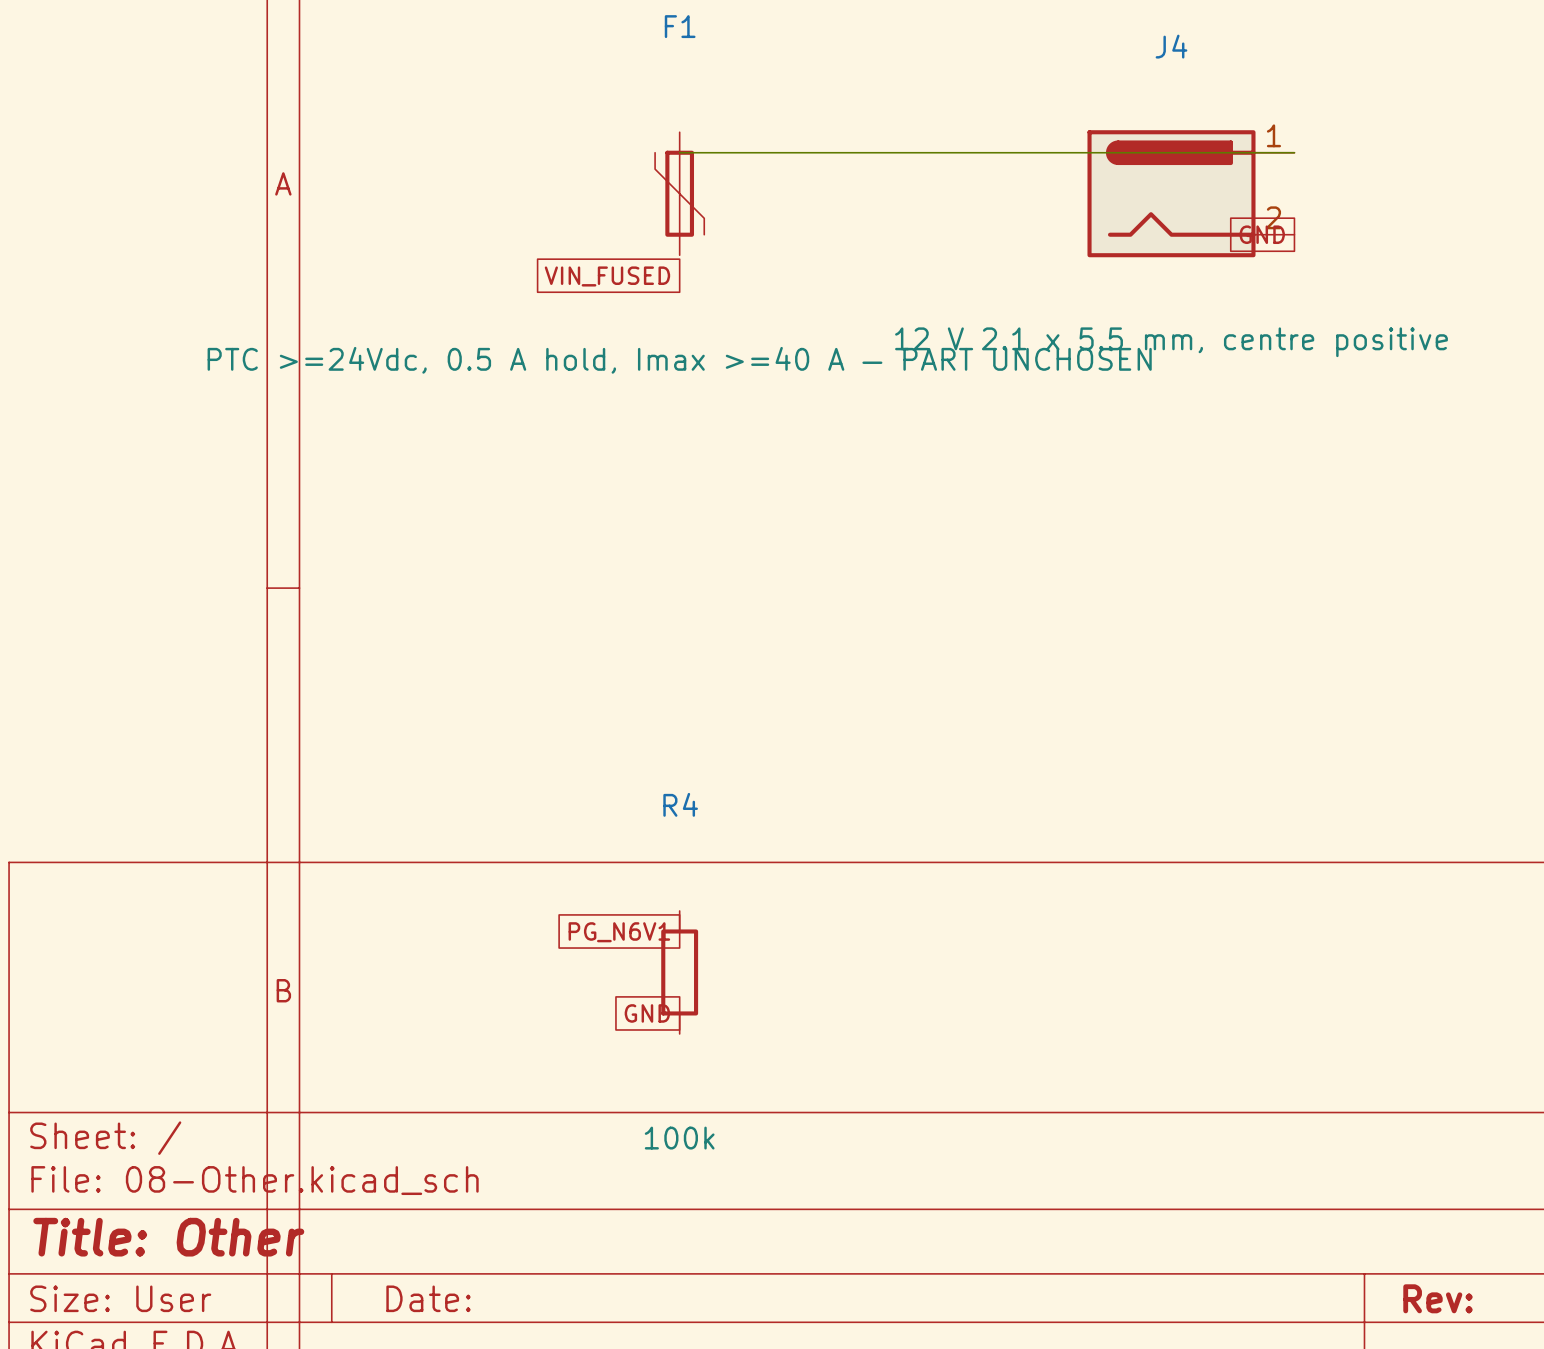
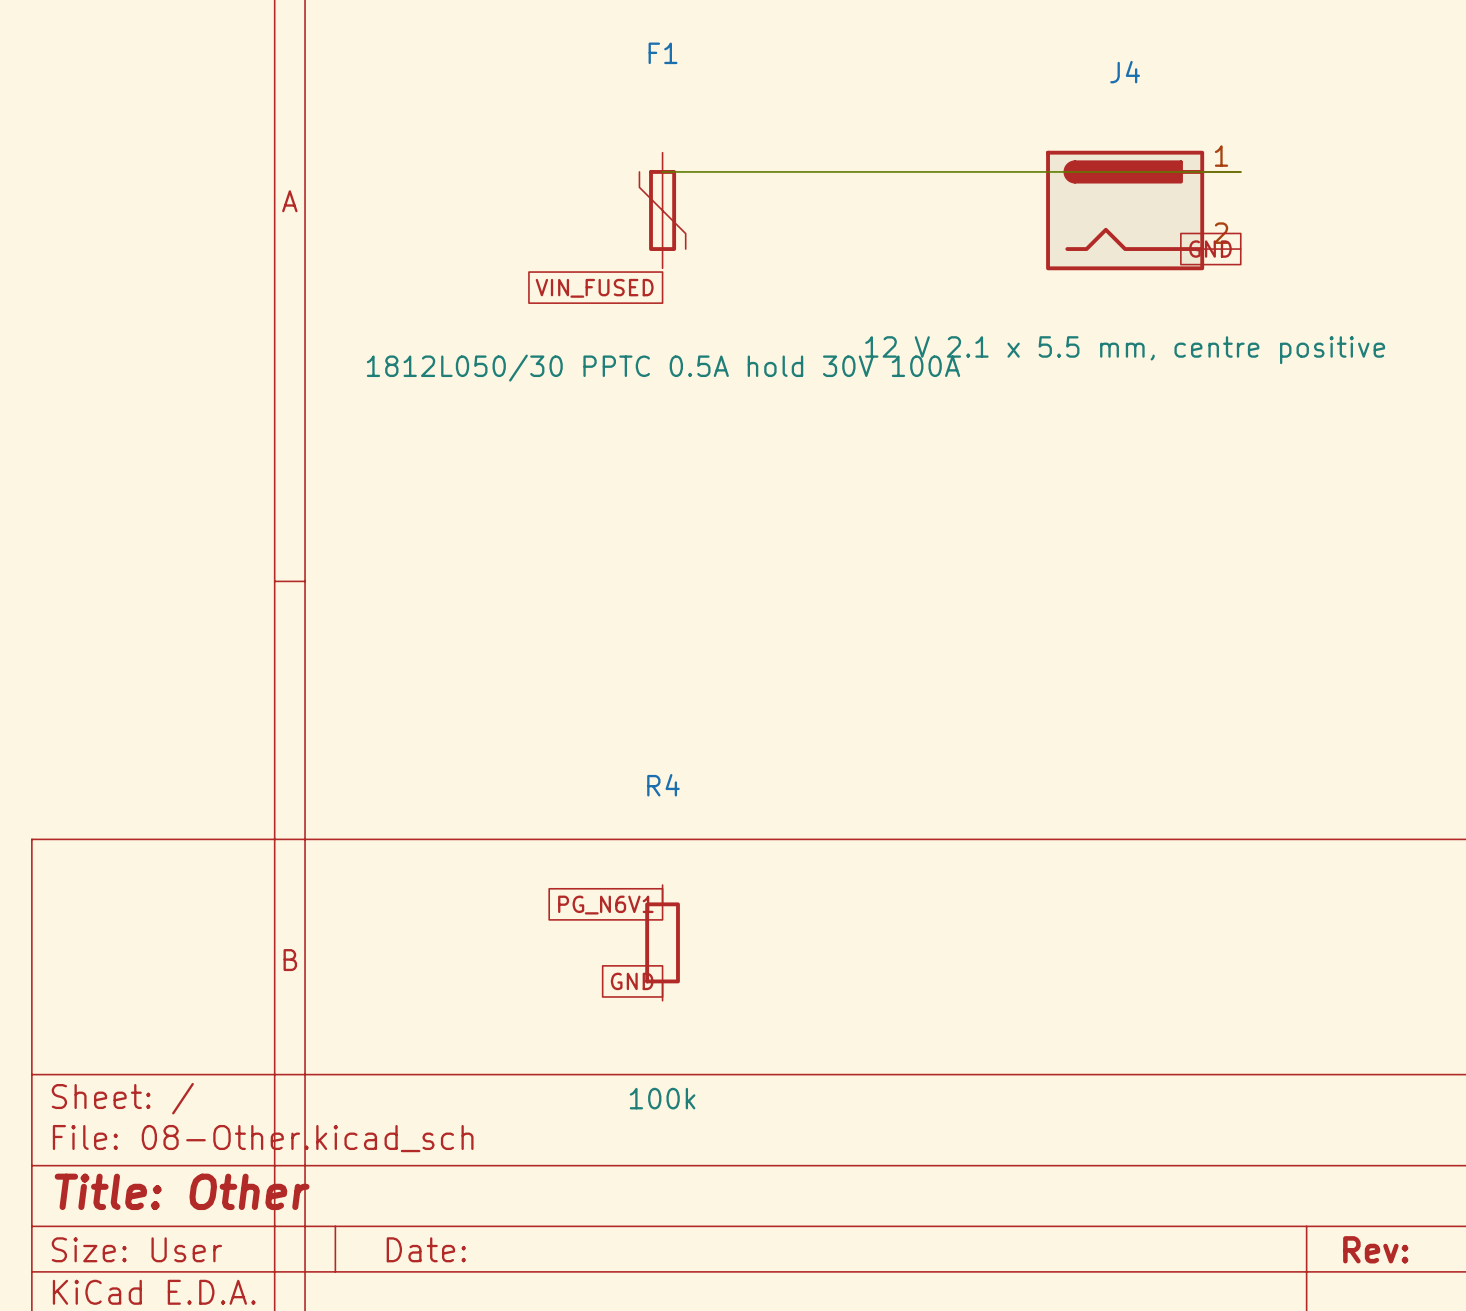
F1 value: PTC >=24Vdc, 0.5 A hold, Imax >=40 A — PART UNCHOSEN (679, 360) -> 1812L050/30 PPTC 0.5A hold 30V 100A (663, 368)

